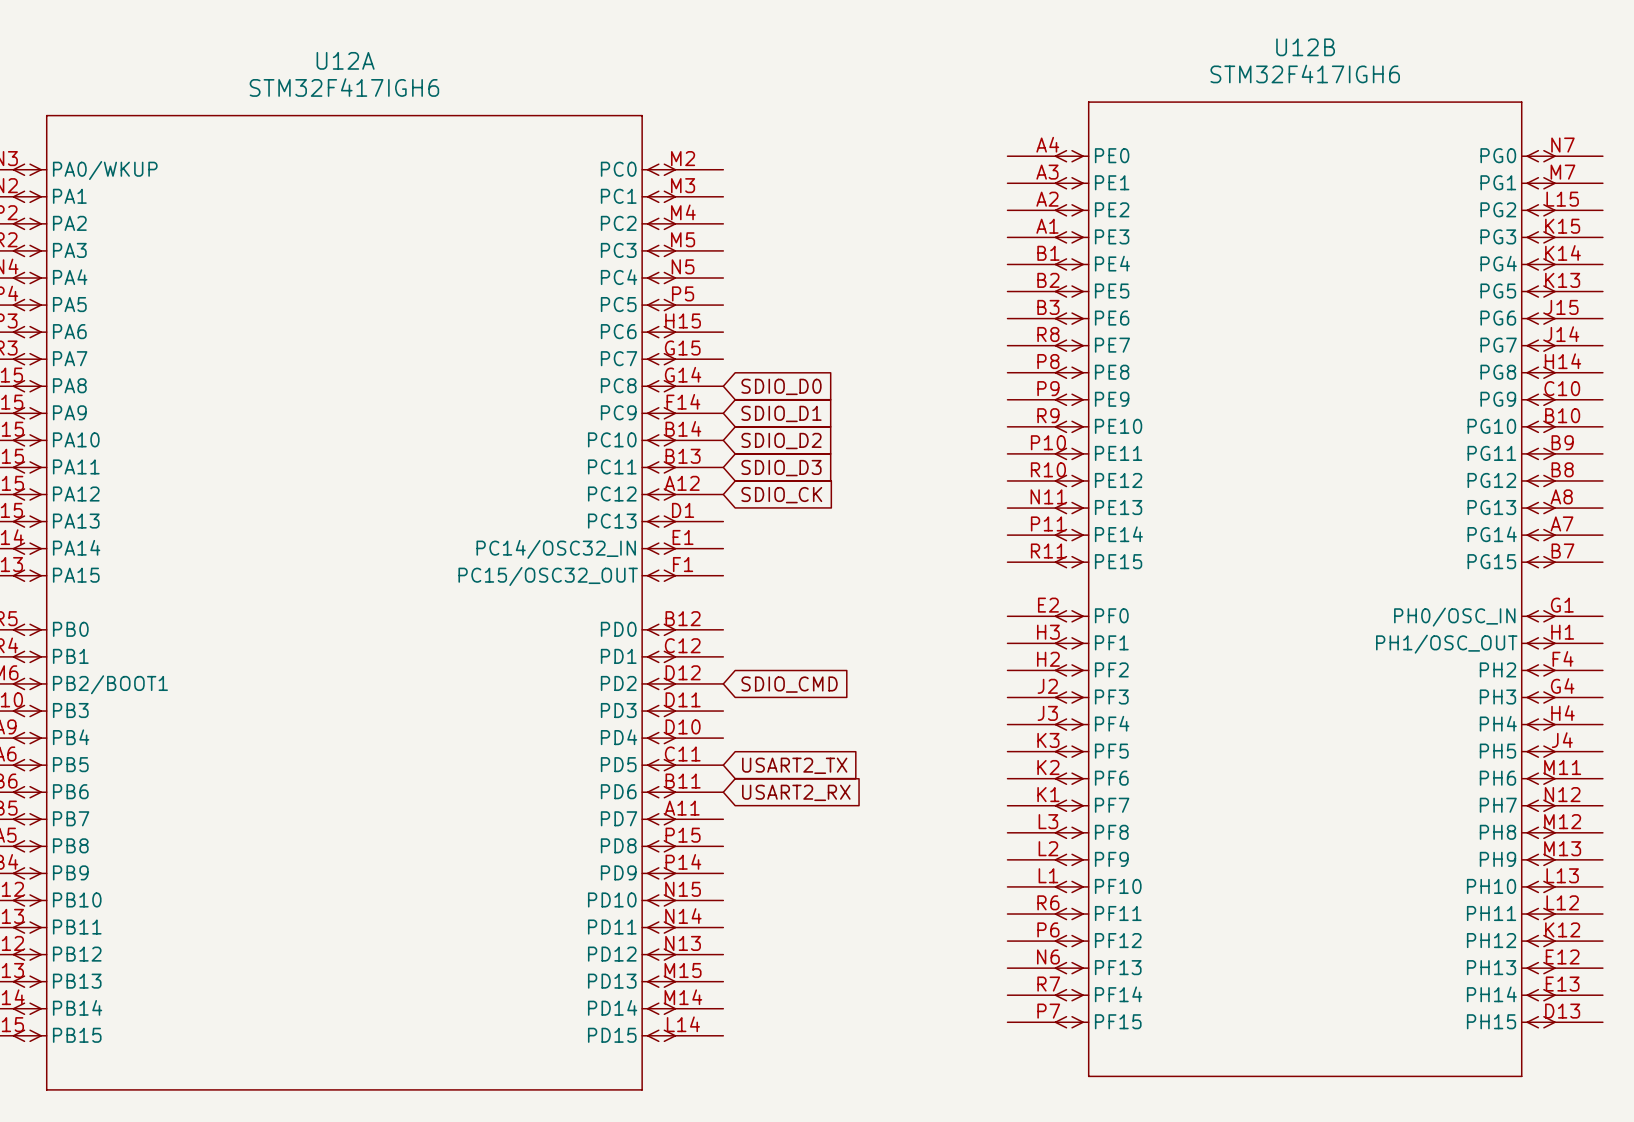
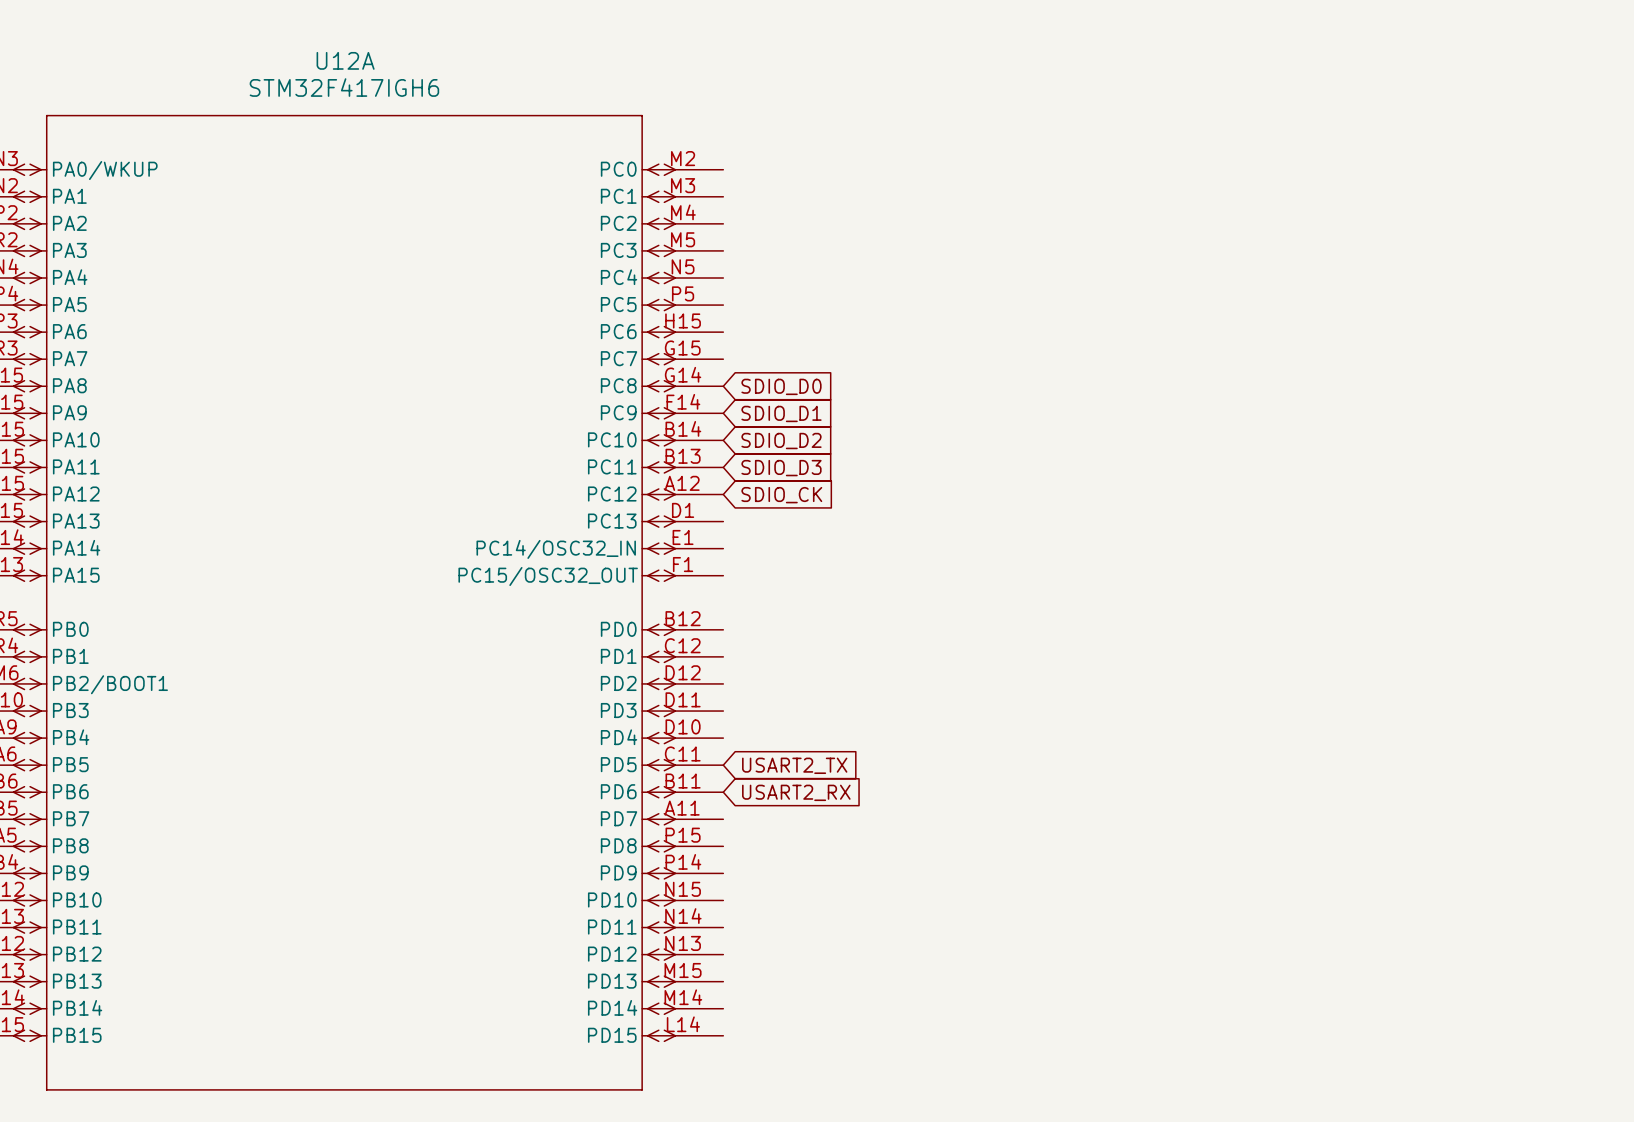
U12B: STM32F417IGH6 (1305, 589) -> none
global label: SDIO_CMD (789, 684) -> none

